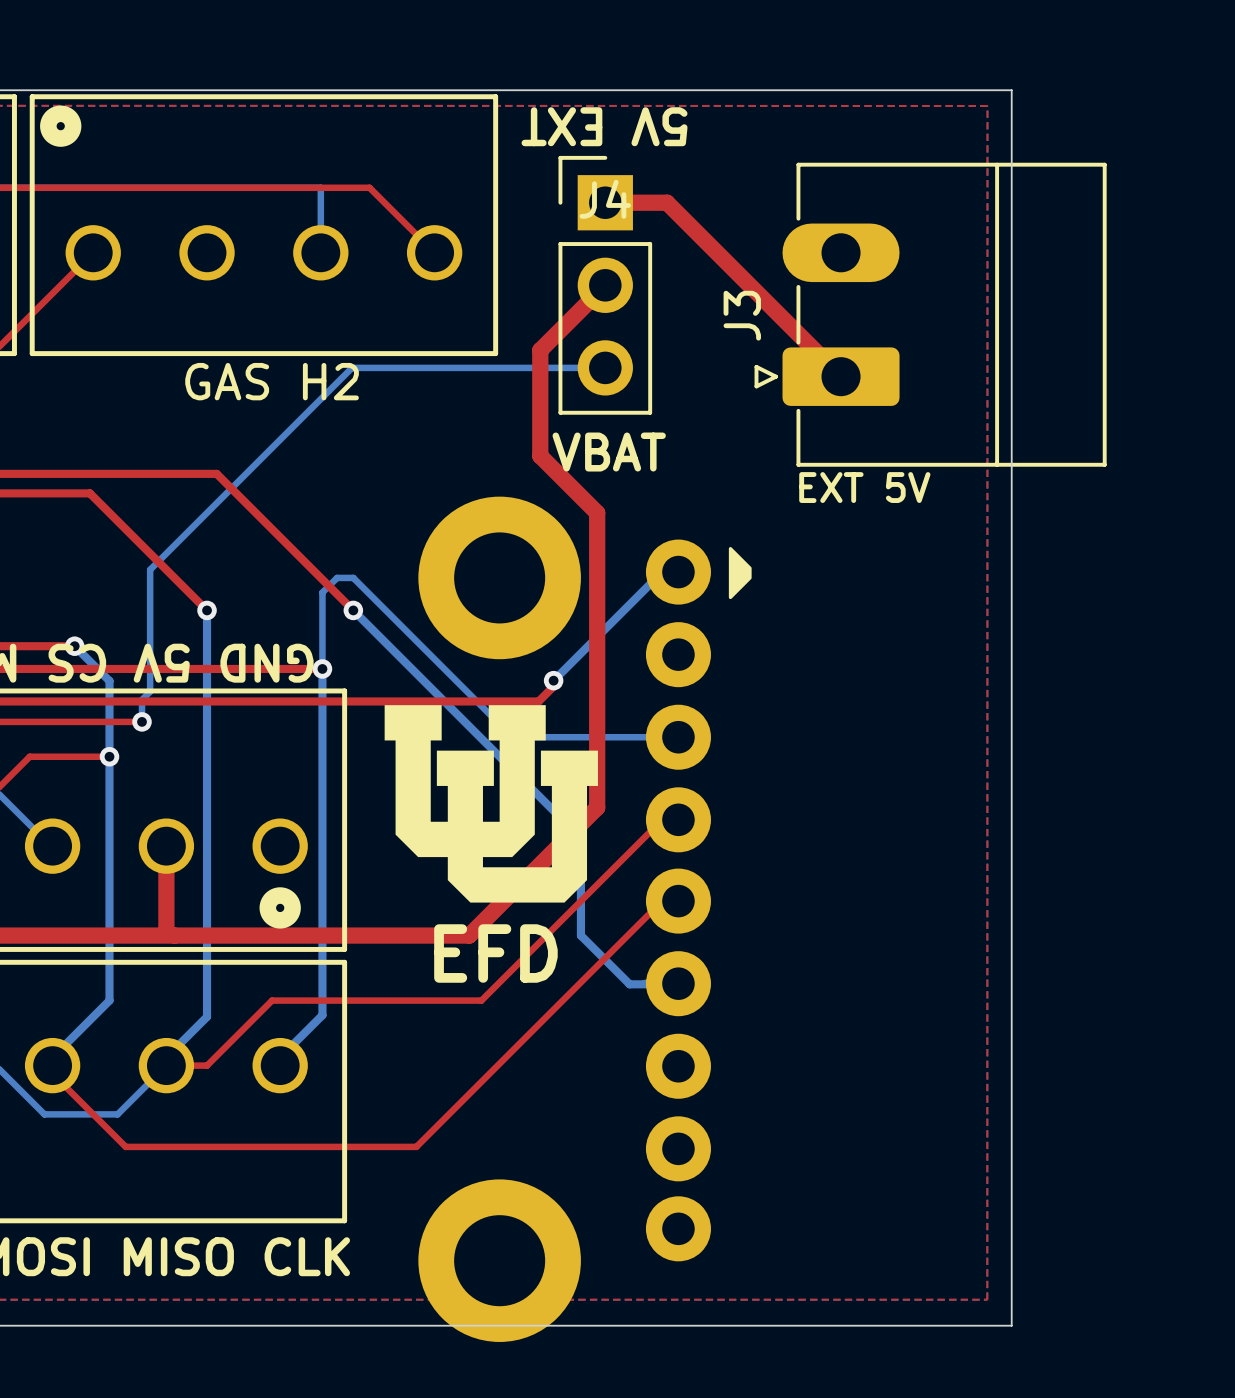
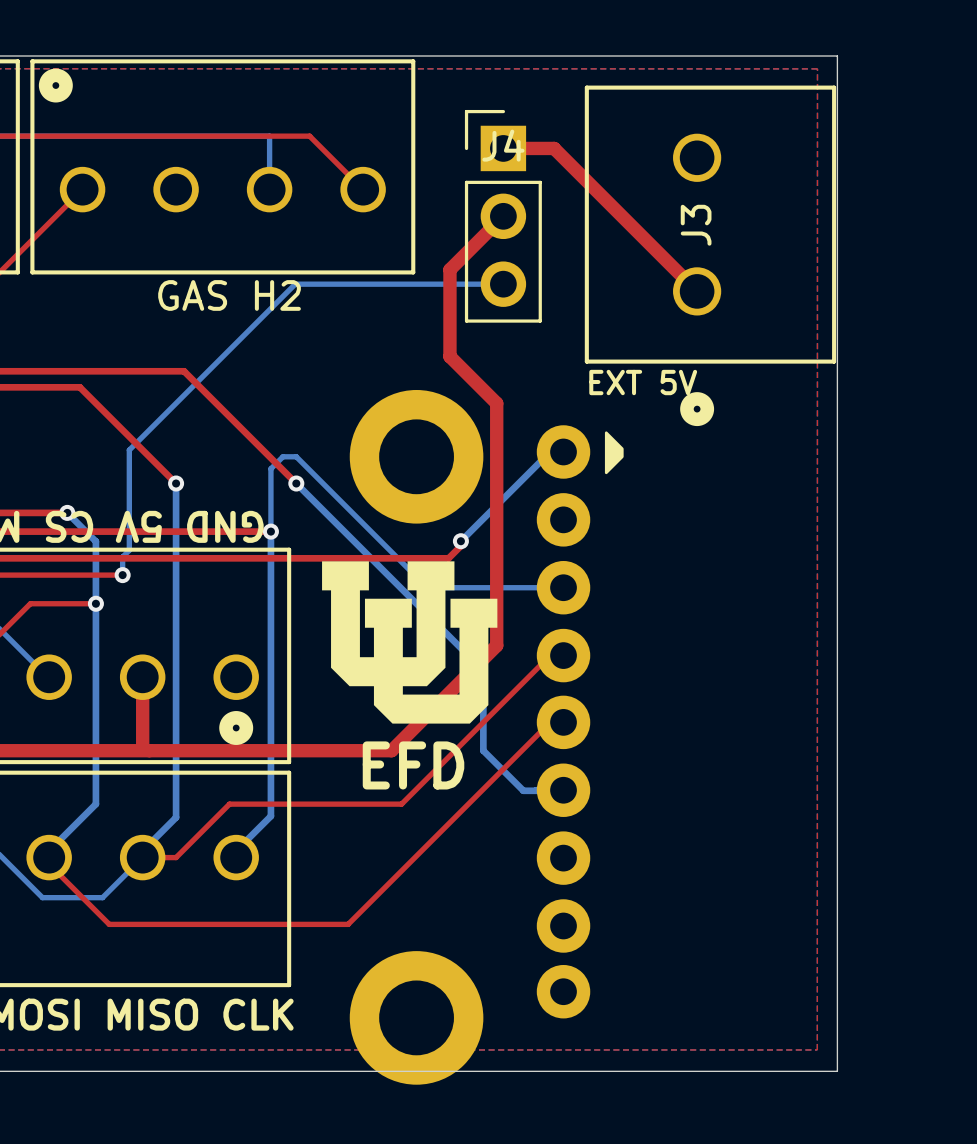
text: 5V EXT (604, 126) -> none
J3 footprint: [754, 162, 1107, 467] -> [584, 85, 837, 427]
J3 name position: J3 (742, 315) -> J3 (696, 225)
text: VBAT (609, 452) -> none
text position: EXT 5V (864, 487) -> EXT 5V (643, 382)

